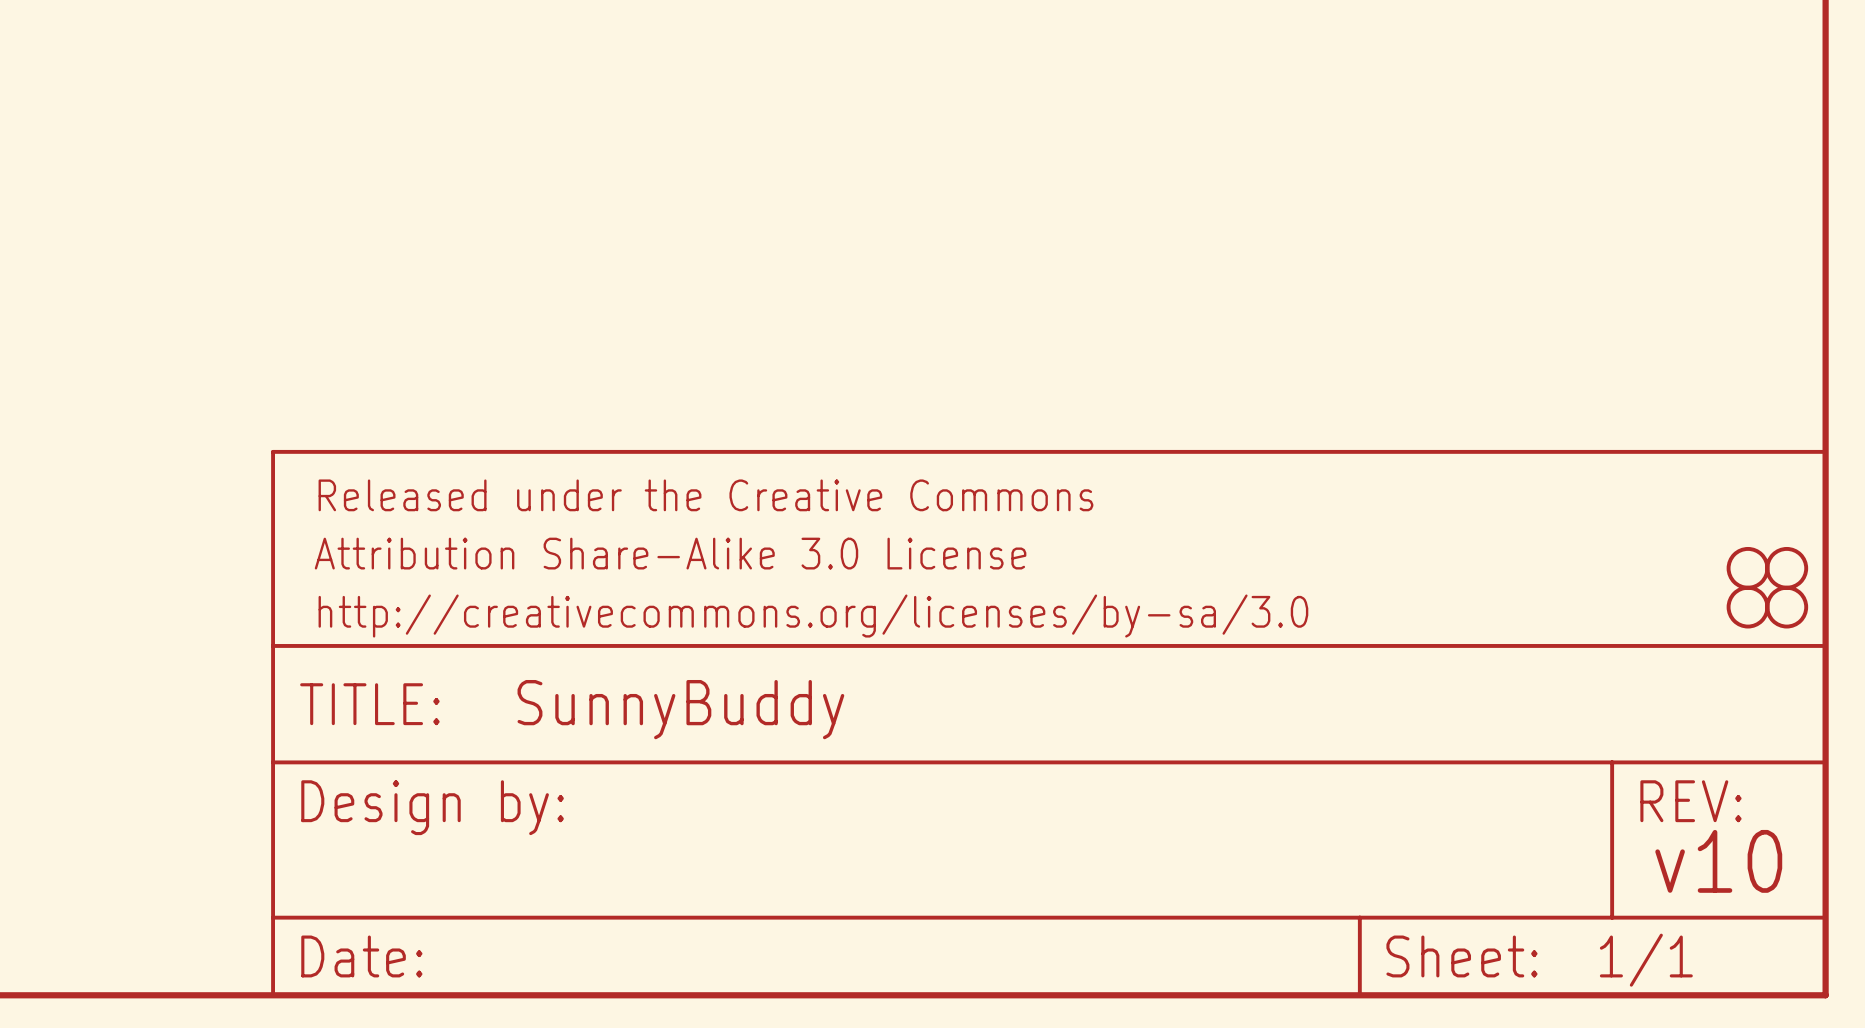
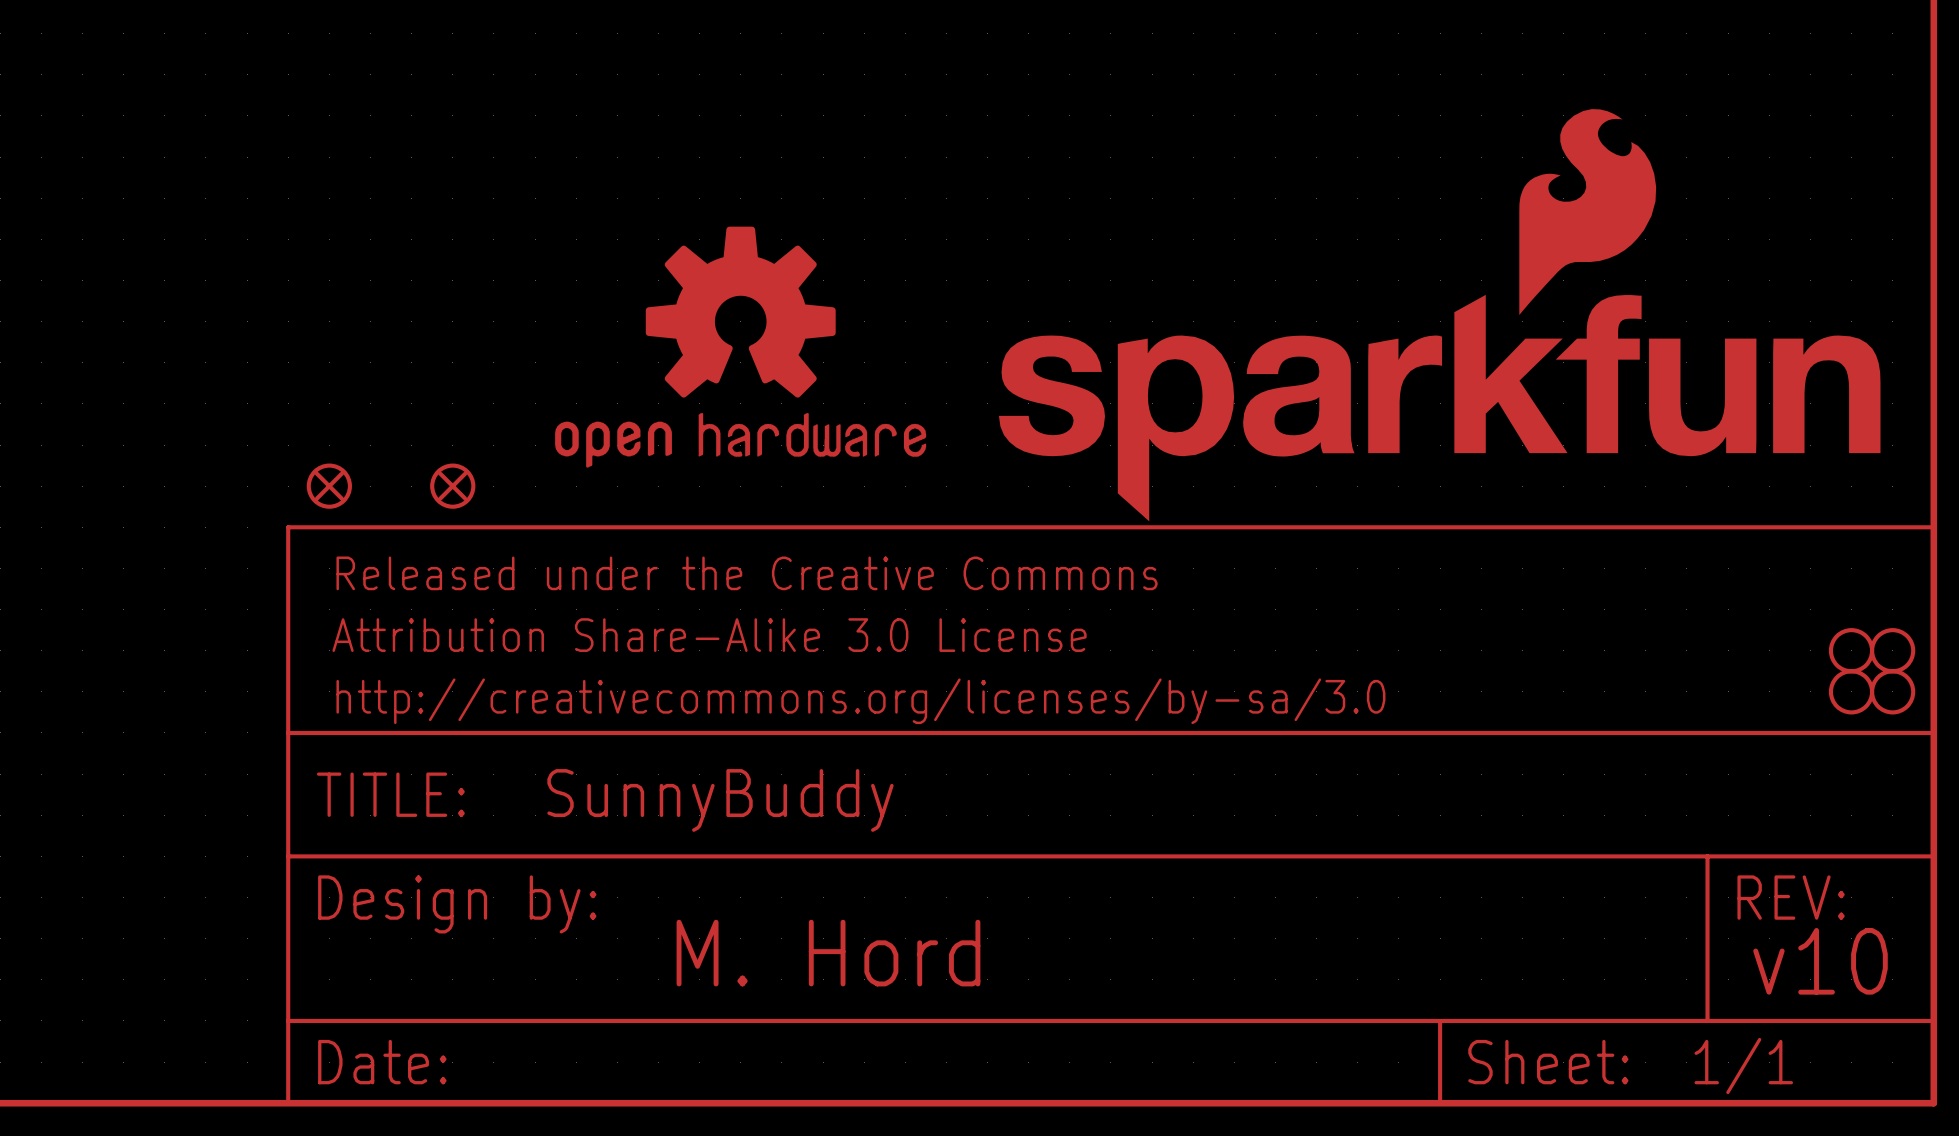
part: none -> (1439, 315)
part: none -> (740, 347)
part: none -> (329, 486)
part: none -> (452, 486)
text: none -> M. Hord (828, 953)

